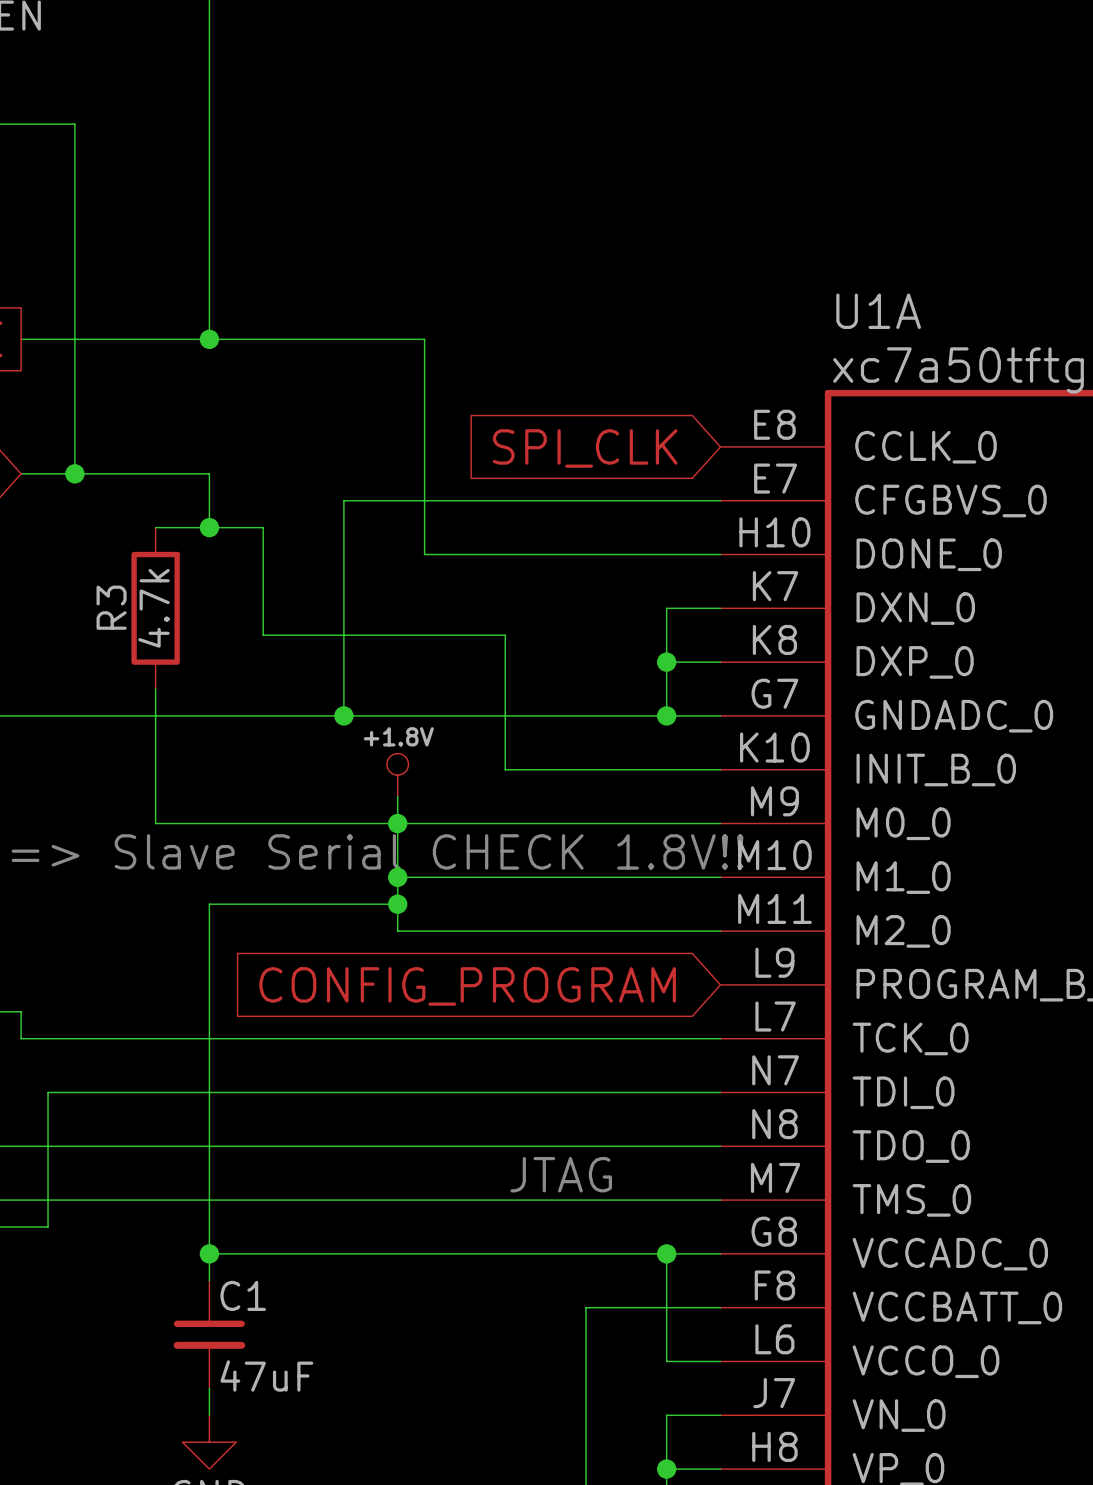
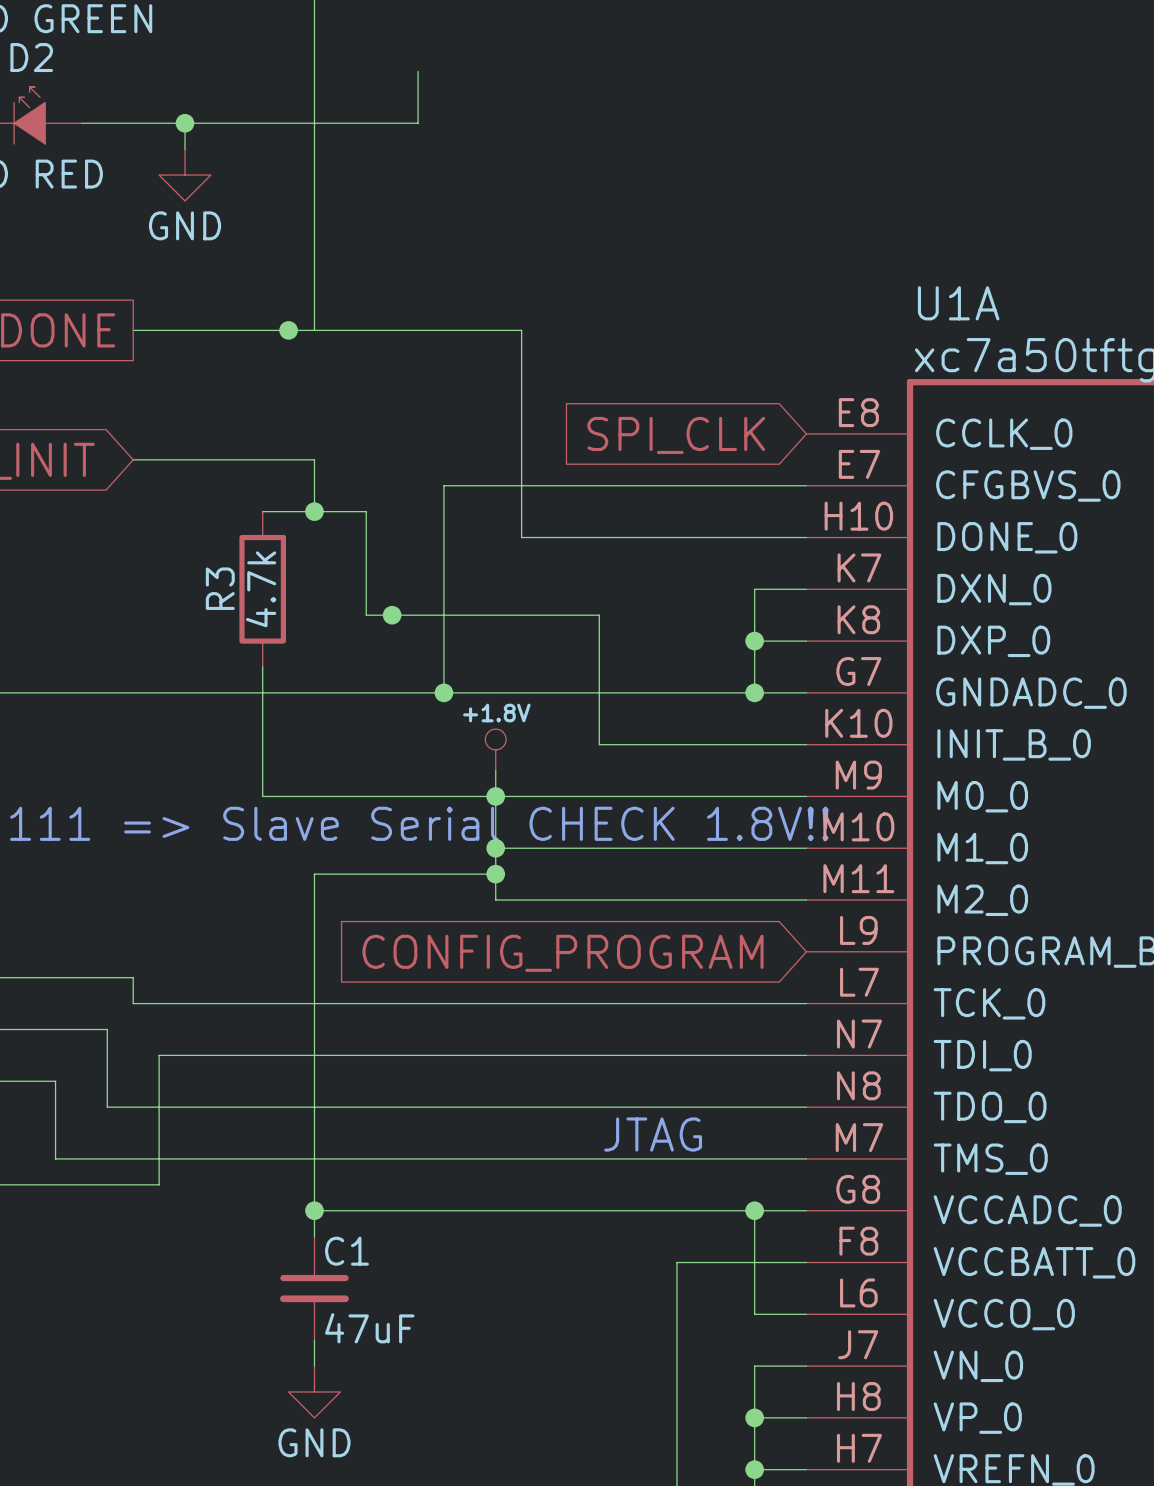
wire: none -> (418, 71) (418, 123) (185, 123)
junction: none -> (185, 123)
wire: (74, 151) (74, 473) -> none
power symbol: none -> GND (185, 175)
junction position: (209, 339) -> (288, 330)
junction: (74, 473) -> none
junction: none -> (392, 615)

